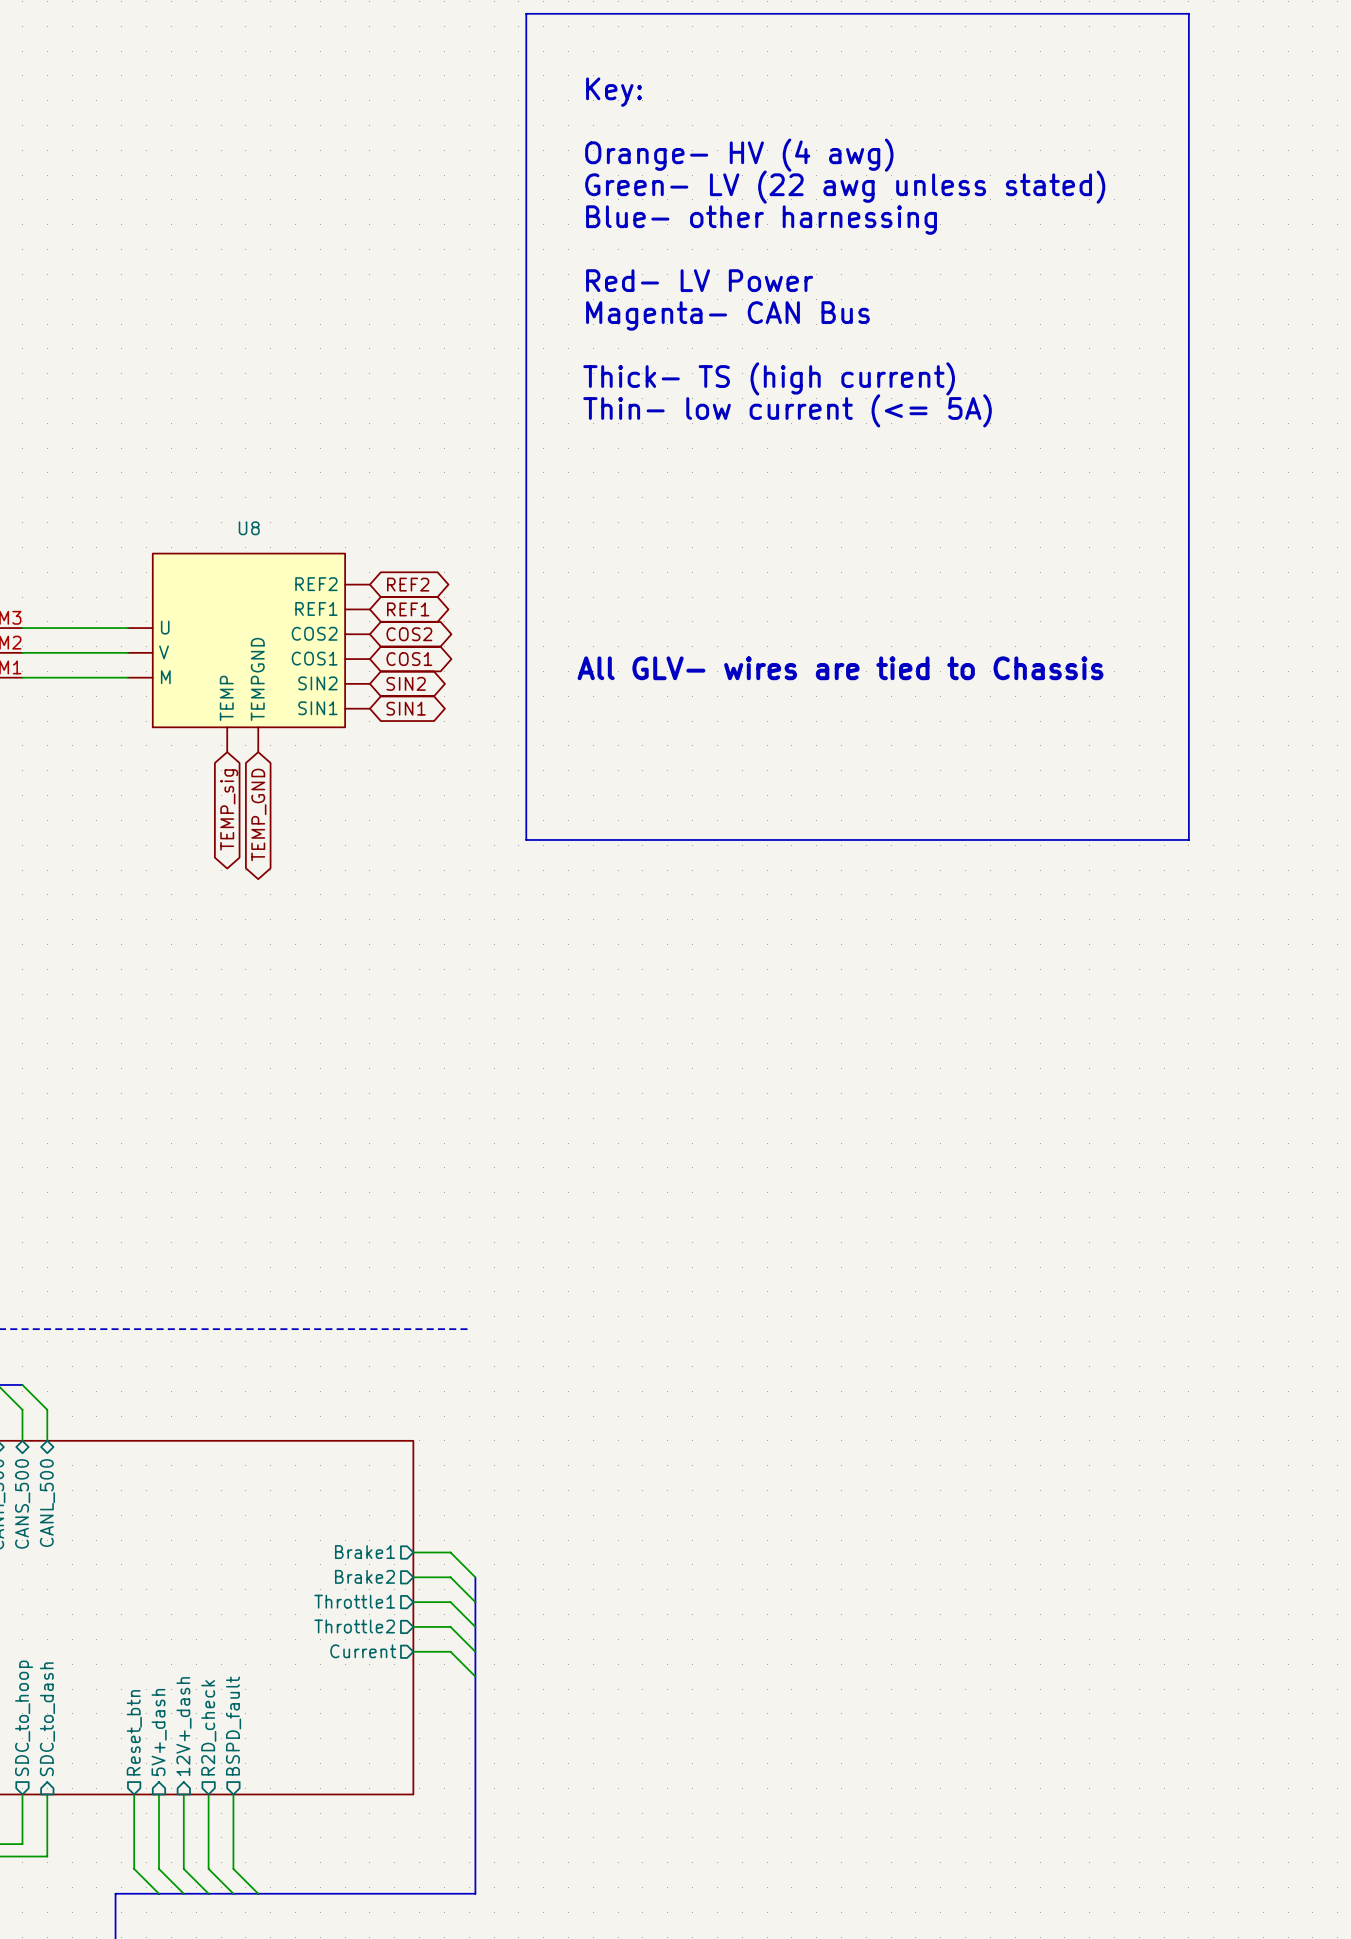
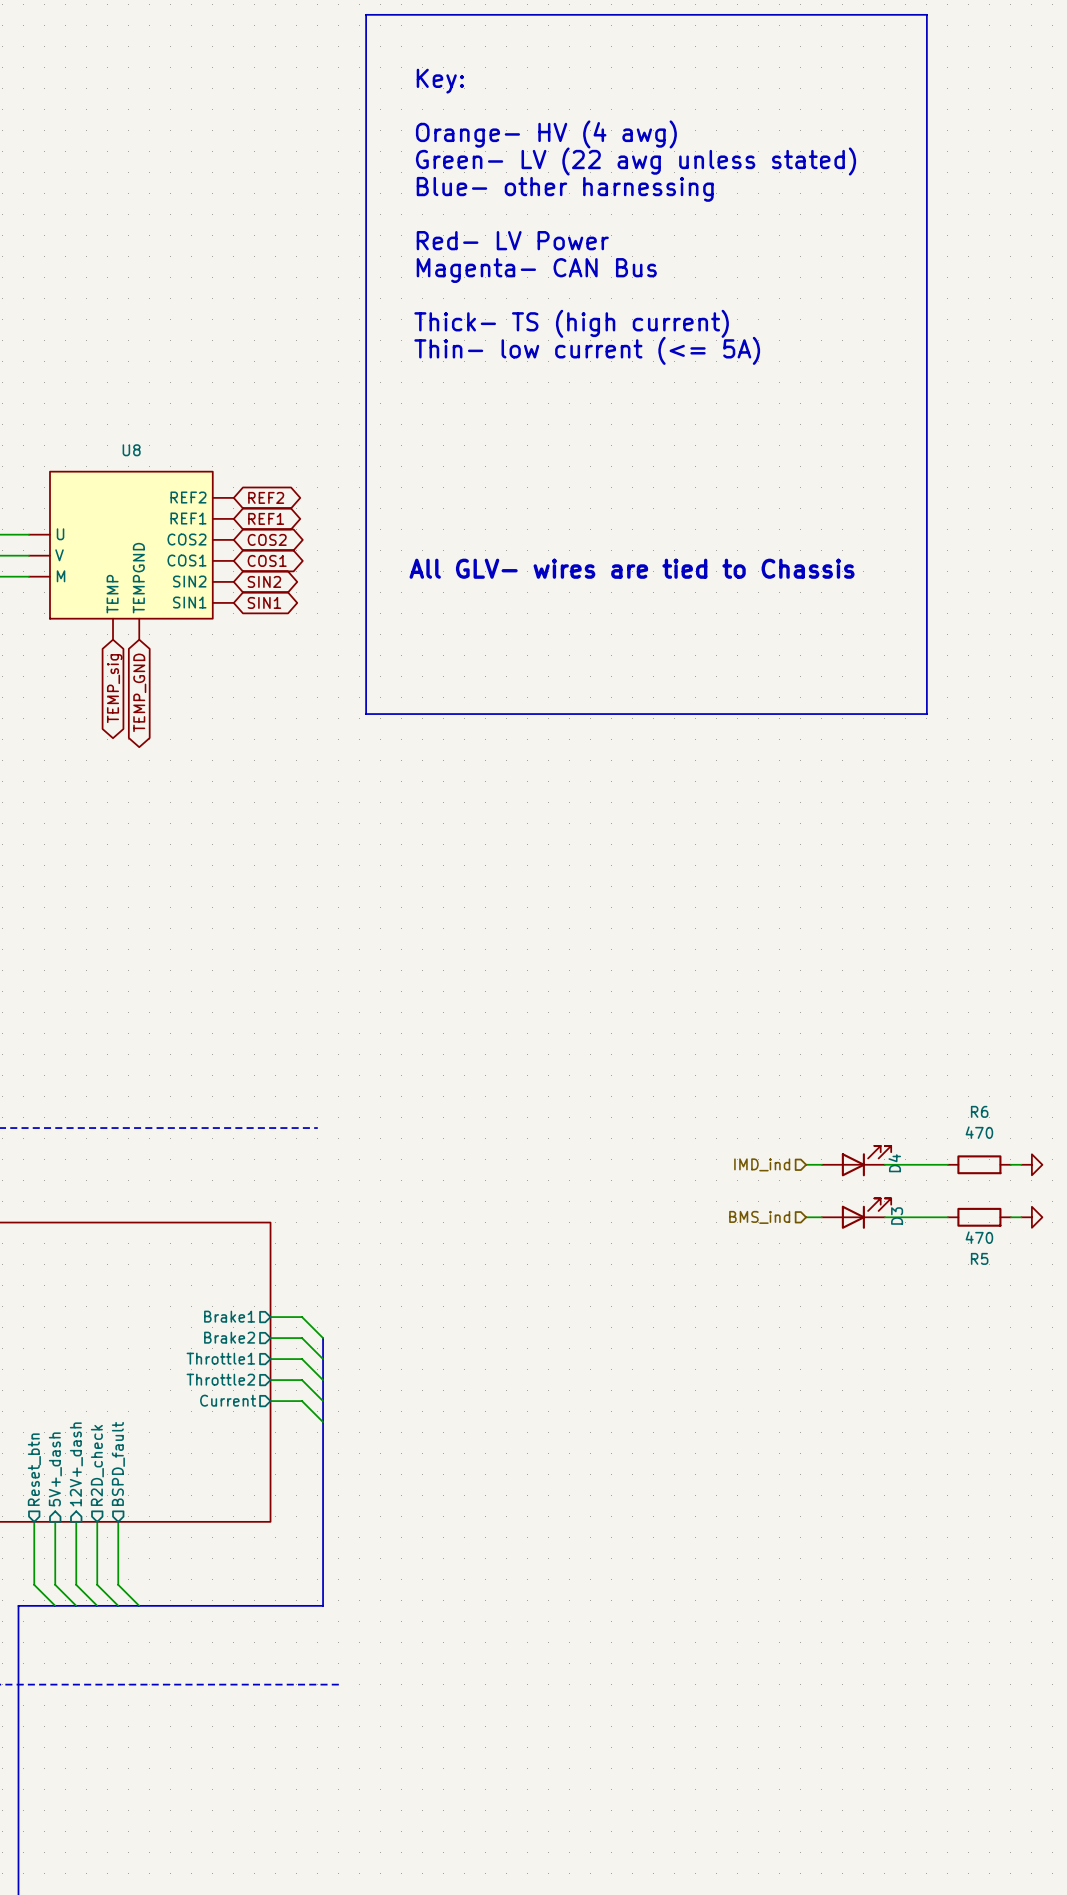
D4: none -> (856, 1161)
hierarchical label: none -> IMD_ind (762, 1164)
wire: none -> (806, 1164) (821, 1164)
wire: none -> (884, 1164) (947, 1164)
R6: none -> 470 (979, 1164)
wire: none -> (1010, 1164) (1021, 1164)
power symbol: none -> (1031, 1164)
D3: none -> (856, 1213)
hierarchical label: none -> BMS_ind (759, 1217)
wire: none -> (806, 1217) (821, 1217)
wire: none -> (884, 1217) (947, 1217)
R5: none -> 470 (979, 1217)
wire: none -> (1010, 1217) (1021, 1217)
power symbol: none -> (1031, 1217)

